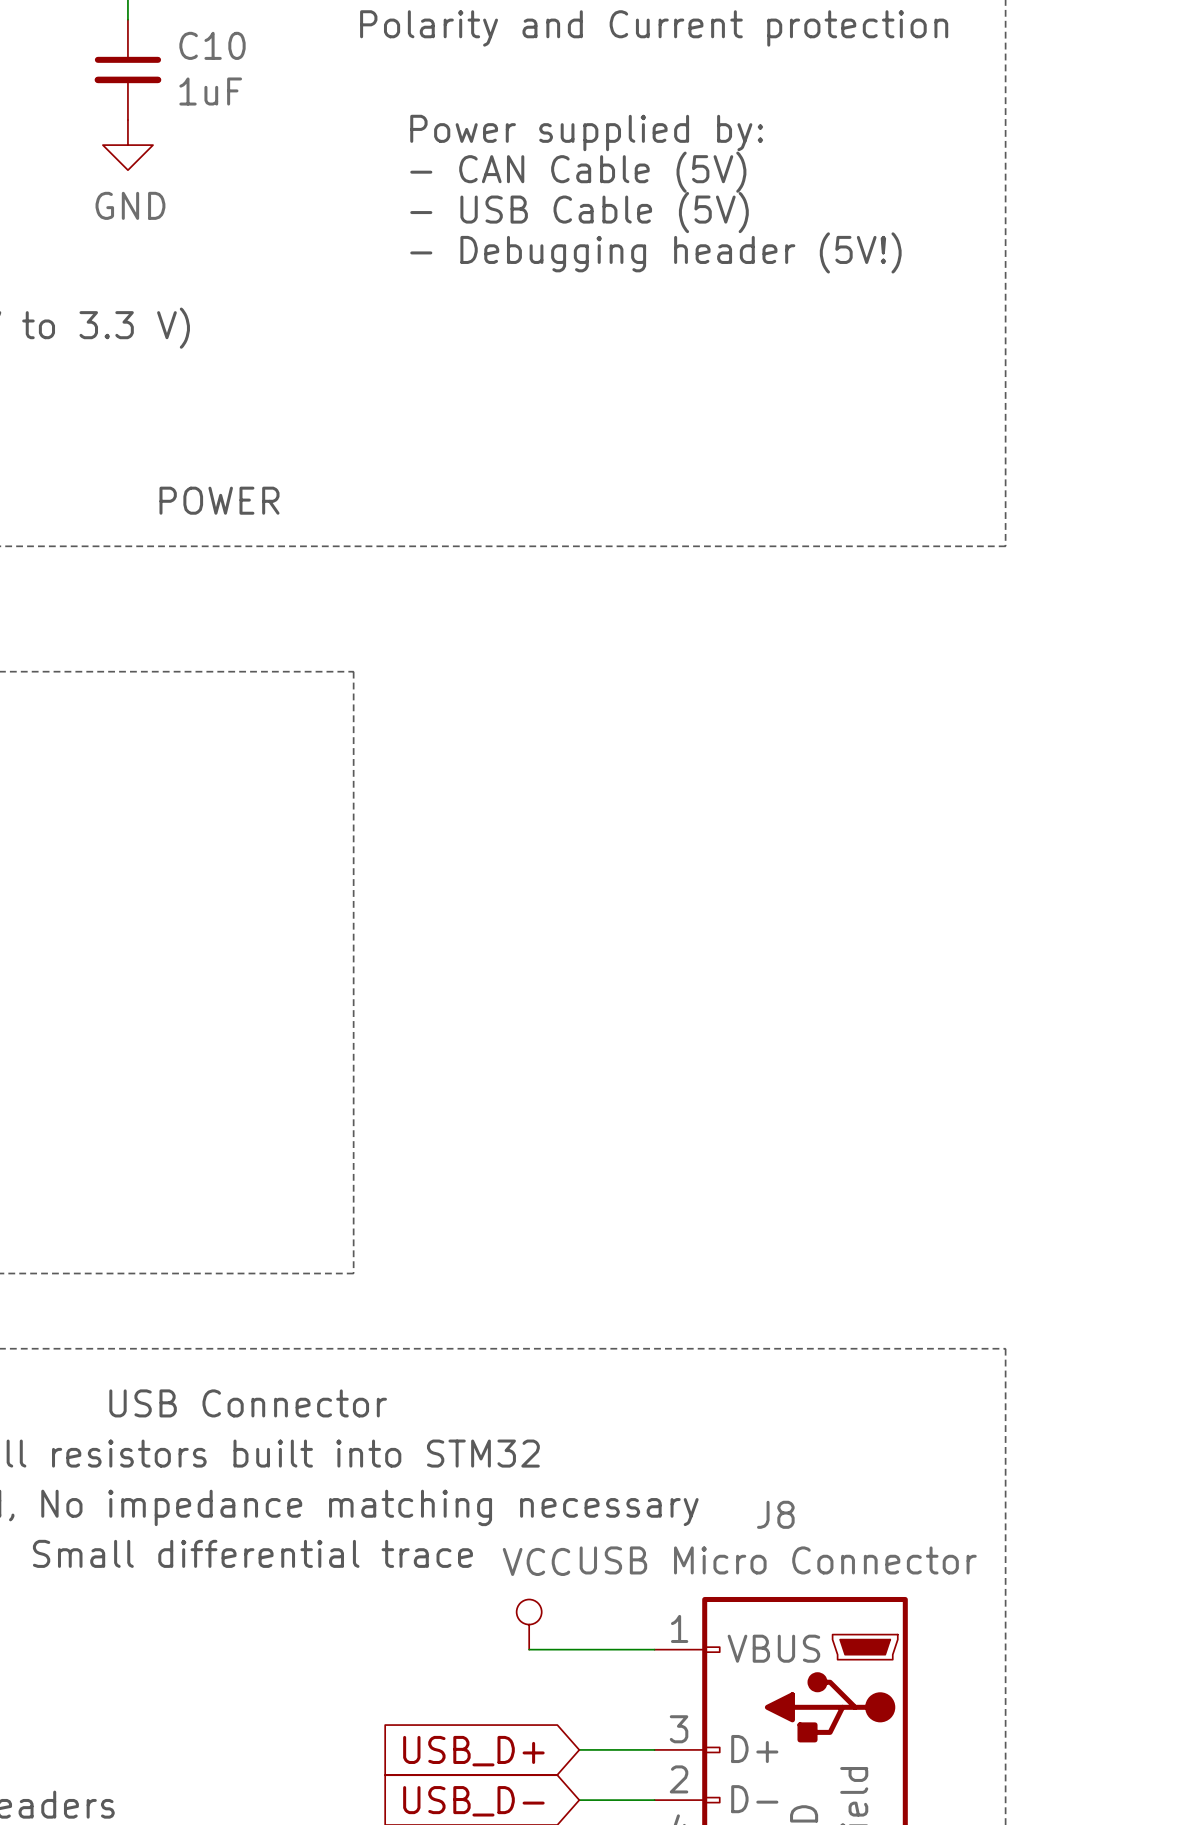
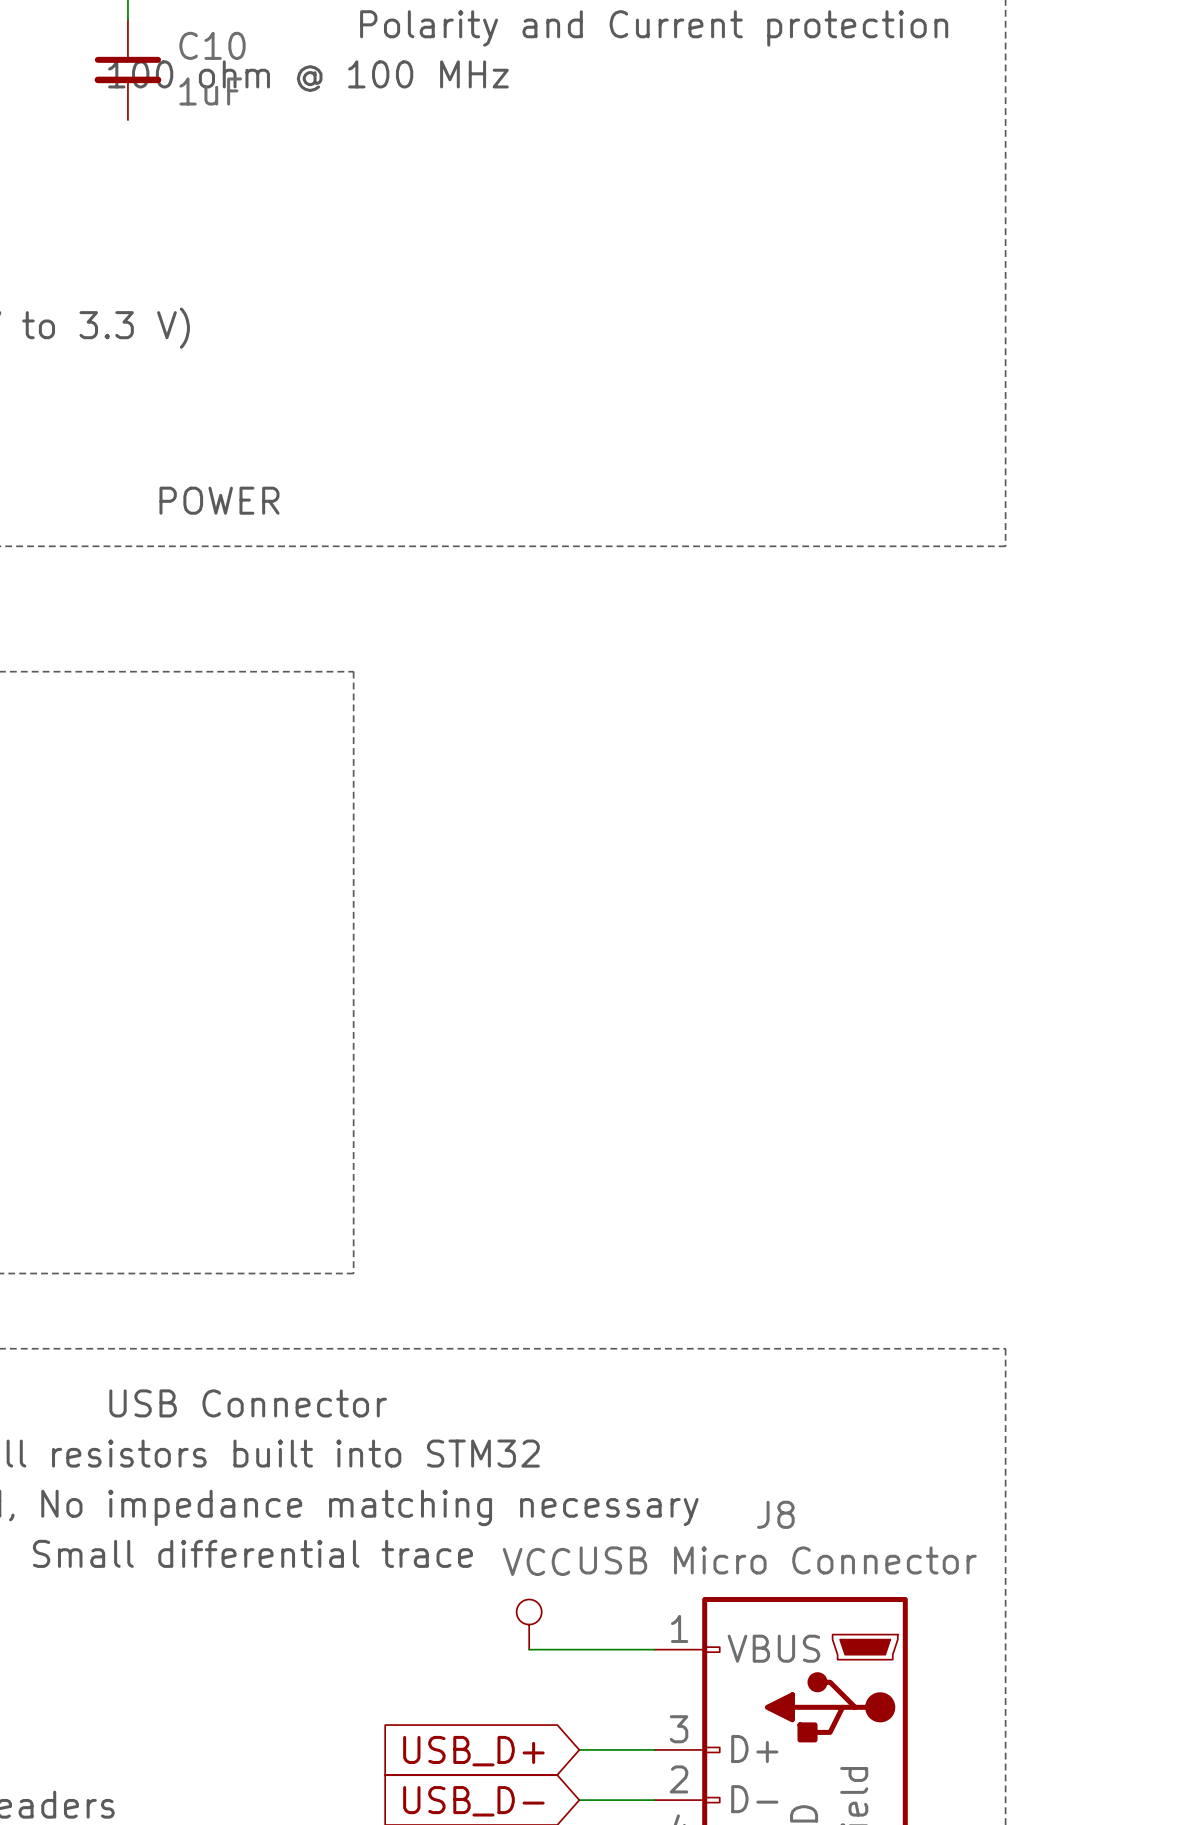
text: none -> 100 ohm @ 100 MHz (308, 76)
text: Power supplied by: (586, 133) -> none
power symbol: GND (127, 145) -> none
text: - CAN Cable (5V) (578, 172) -> none
text: - USB Cable (5V) (579, 212) -> none
text: - Debugging header (5V!) (655, 252) -> none

